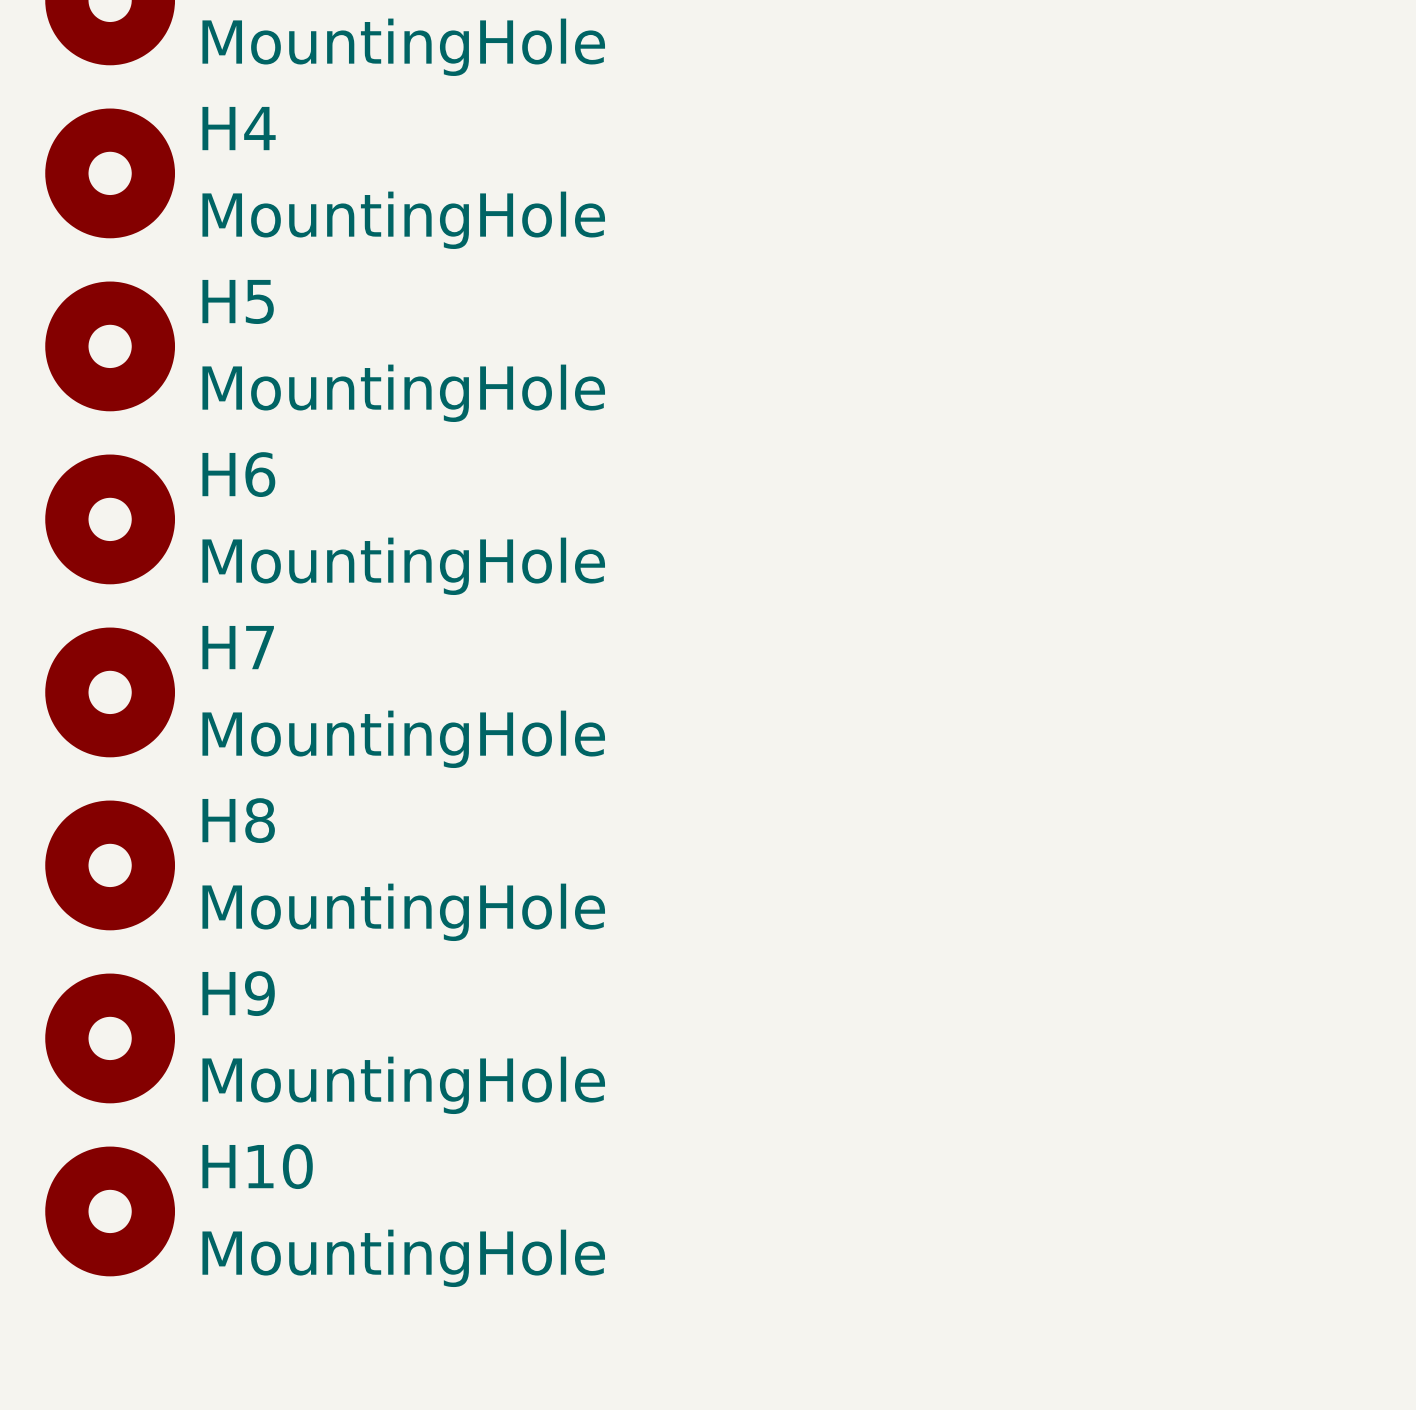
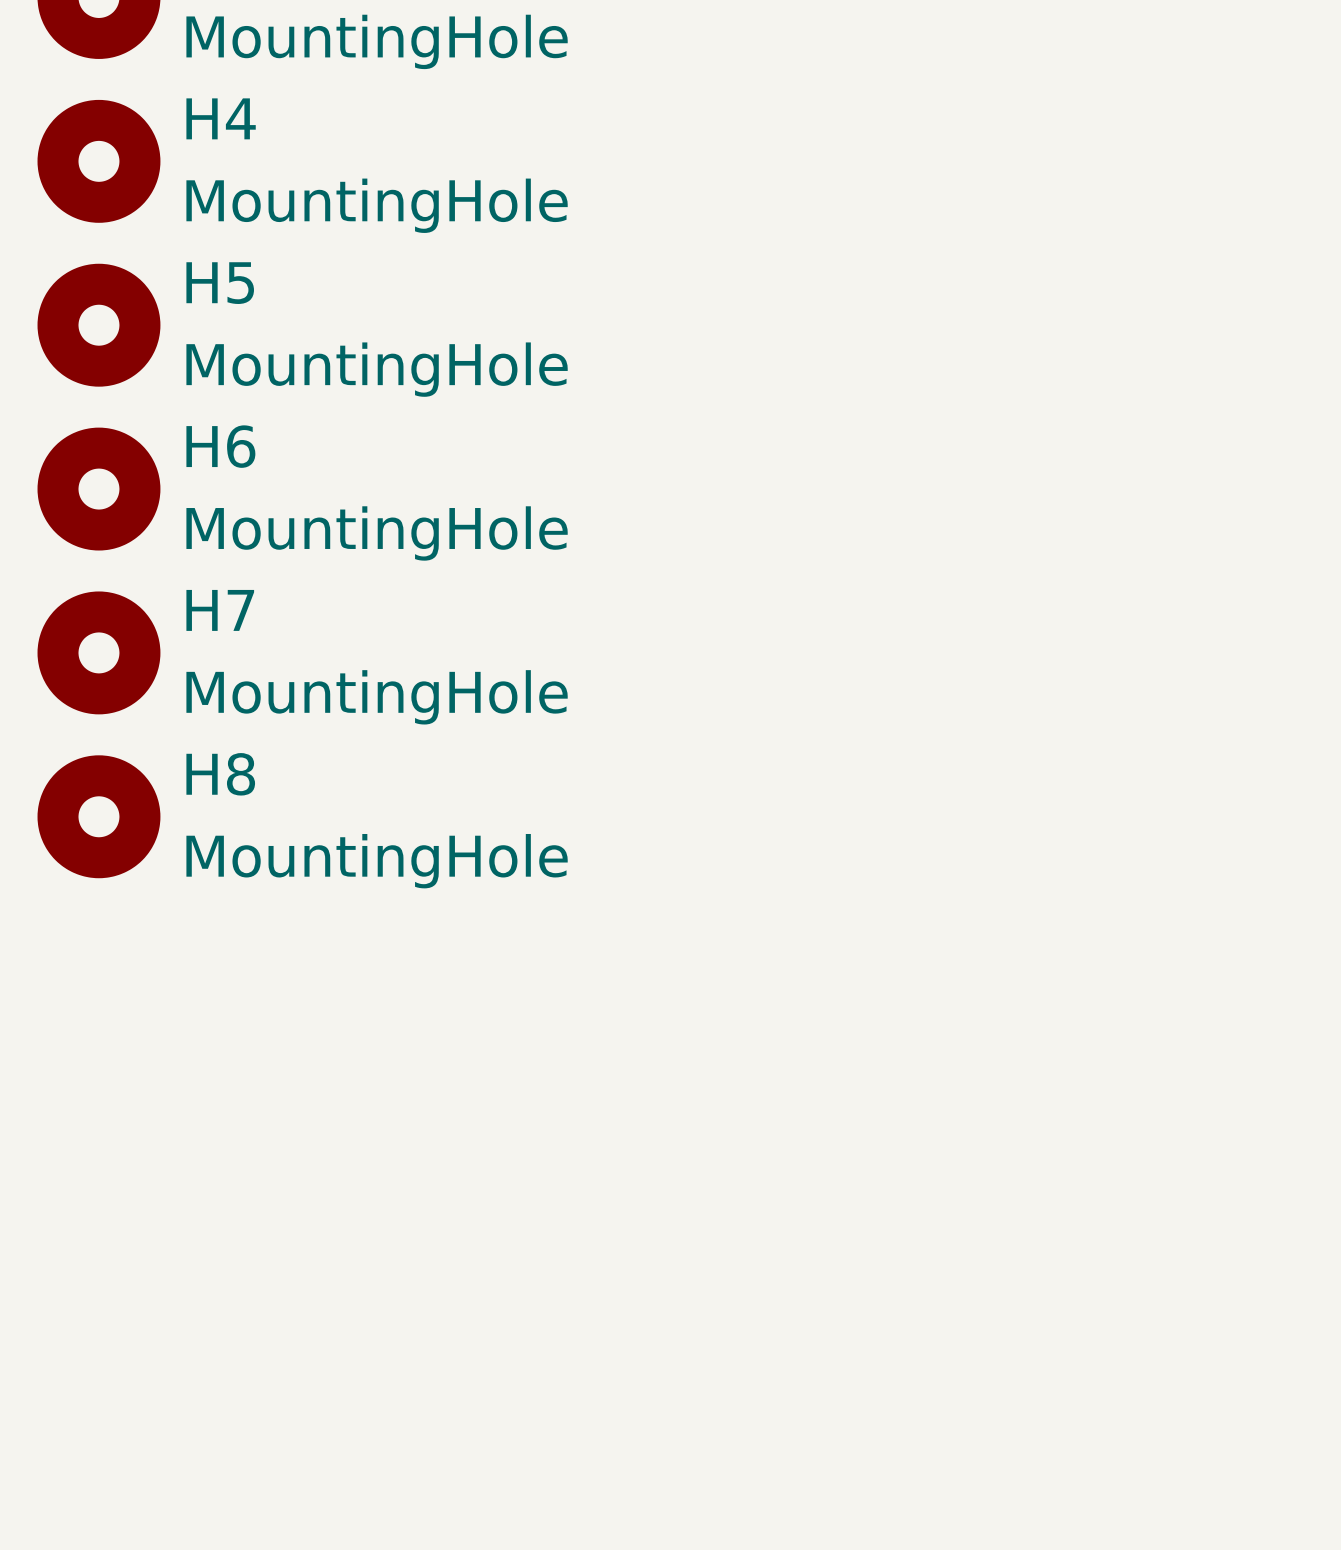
H9: MountingHole (110, 1038) -> none
H10: MountingHole (110, 1211) -> none

